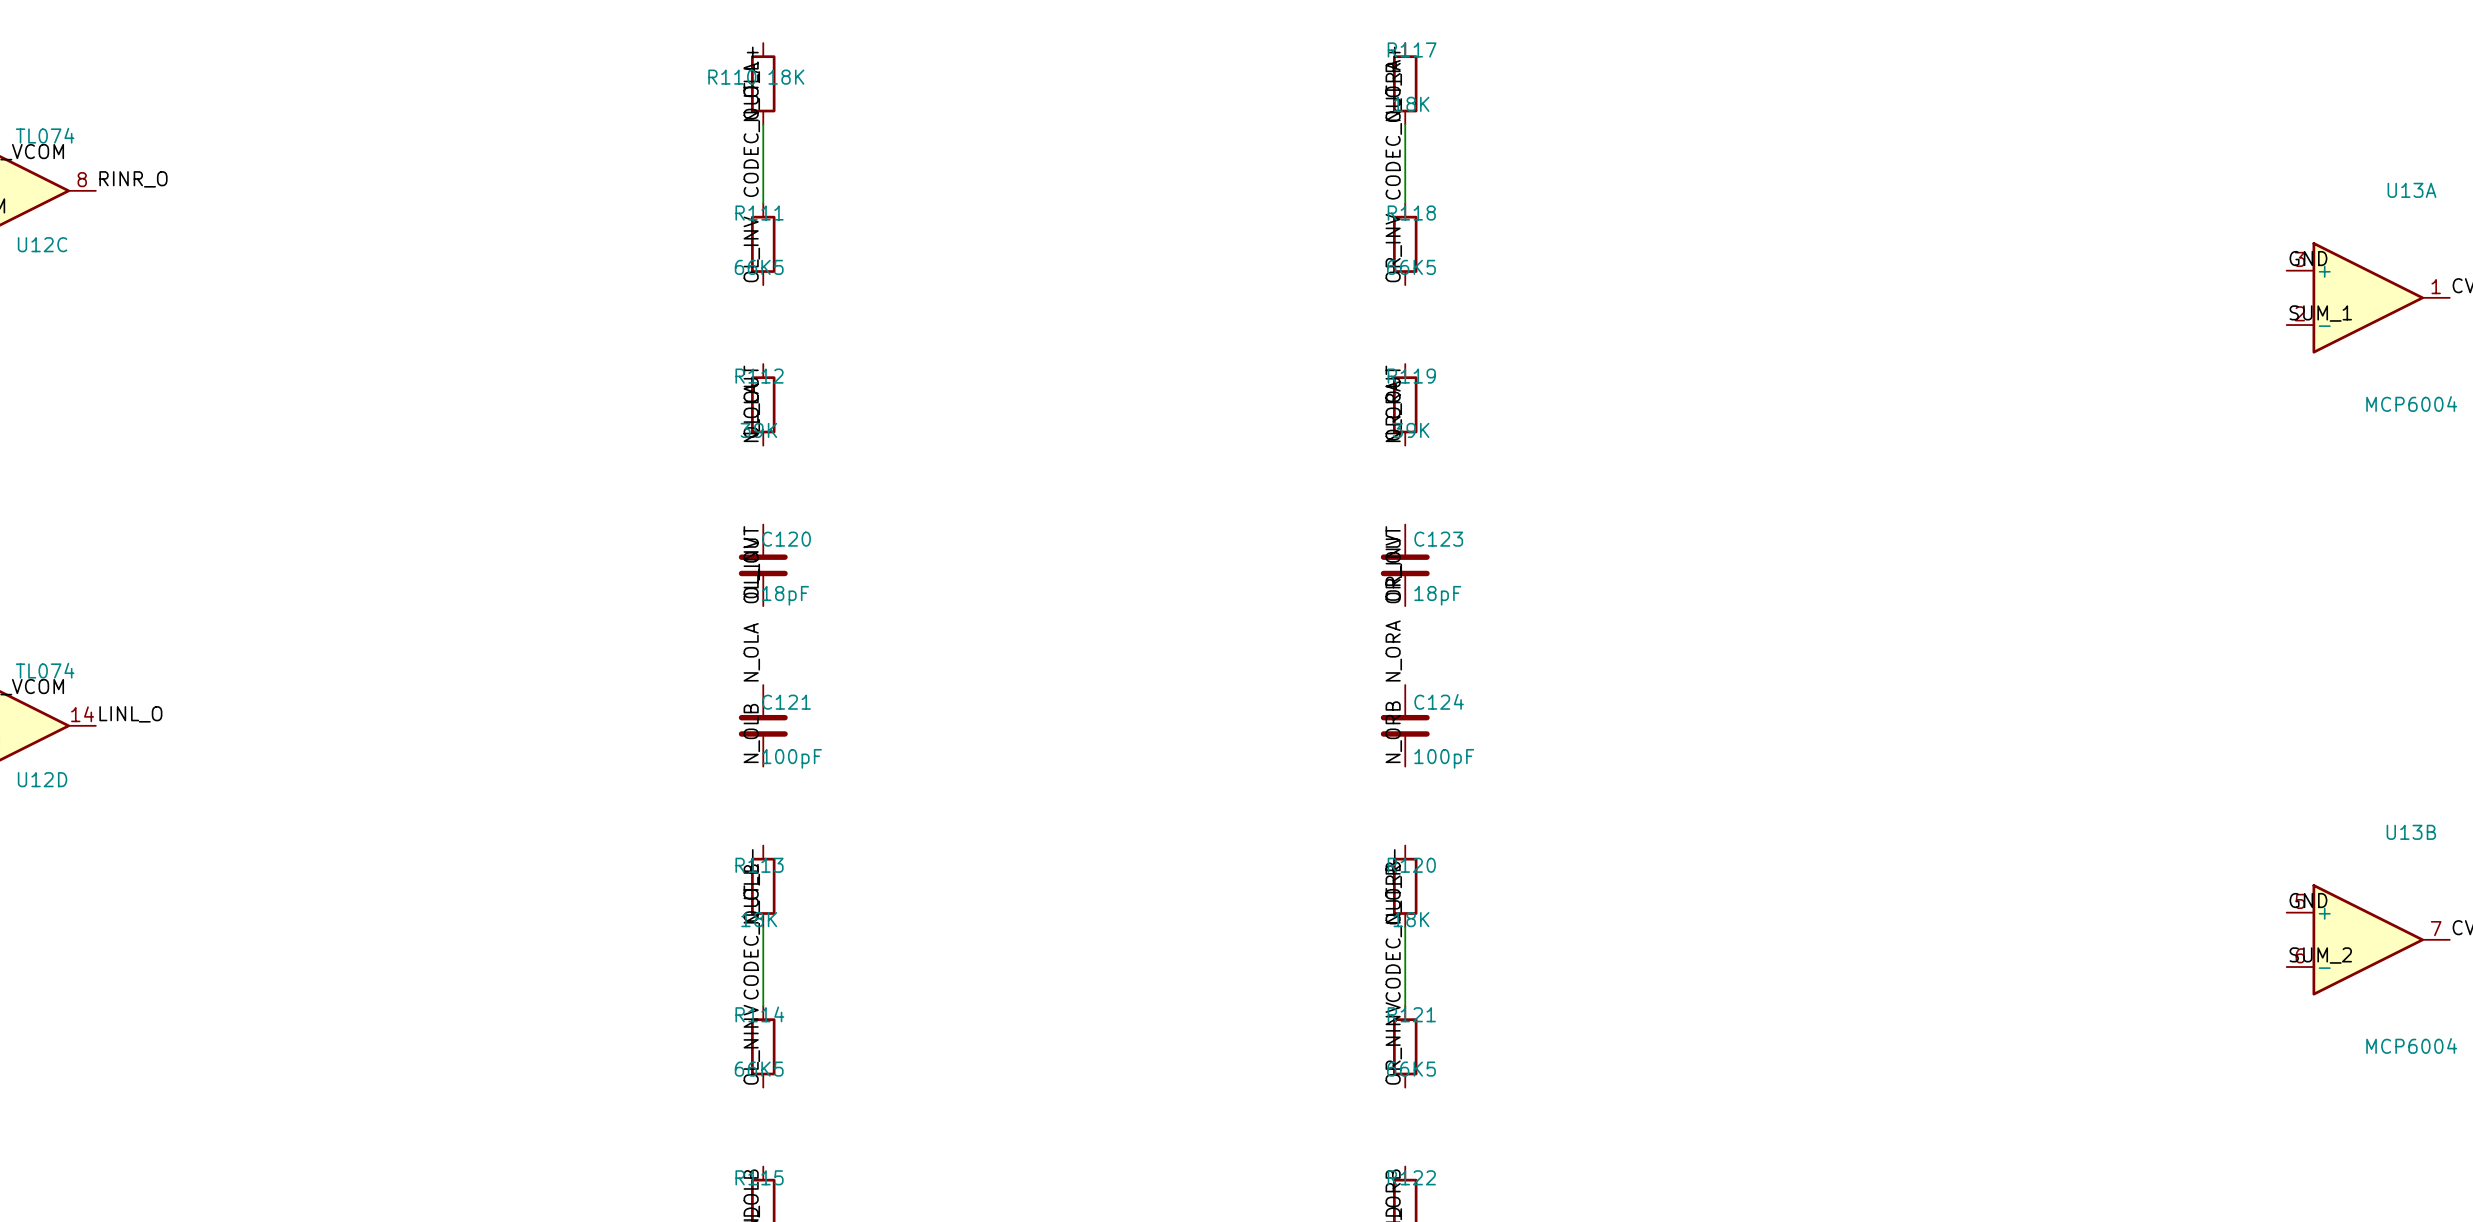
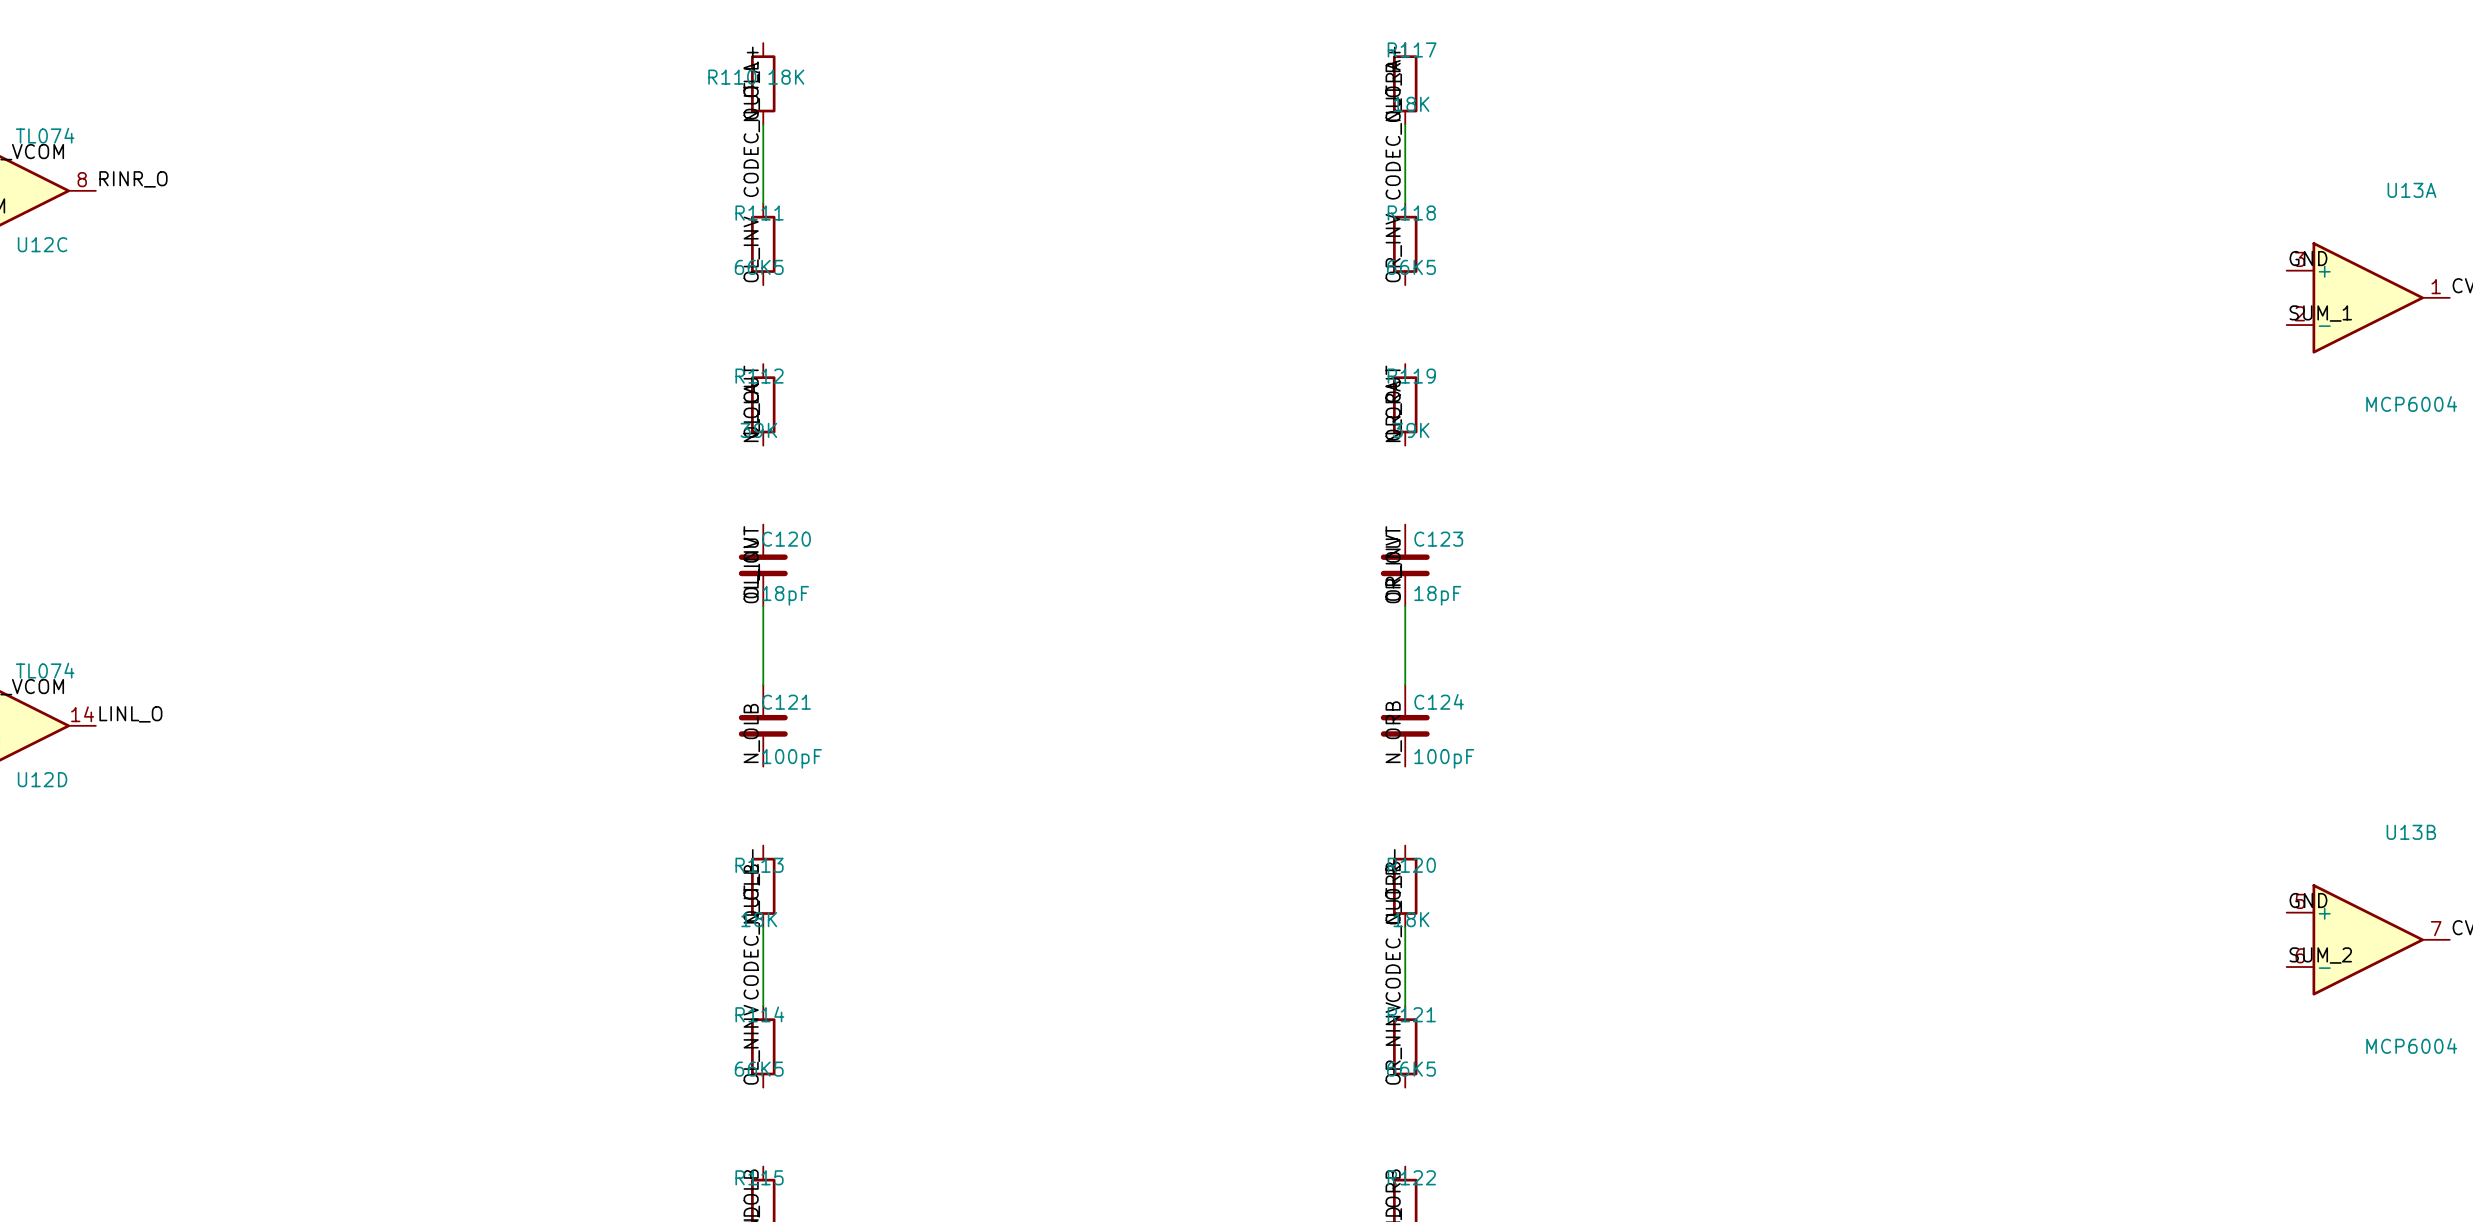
wire: none -> (763, 606) (763, 685)
wire: none -> (1405, 606) (1405, 685)
label: N_ORA (1393, 650) -> none
label: N_OLA (751, 652) -> none

